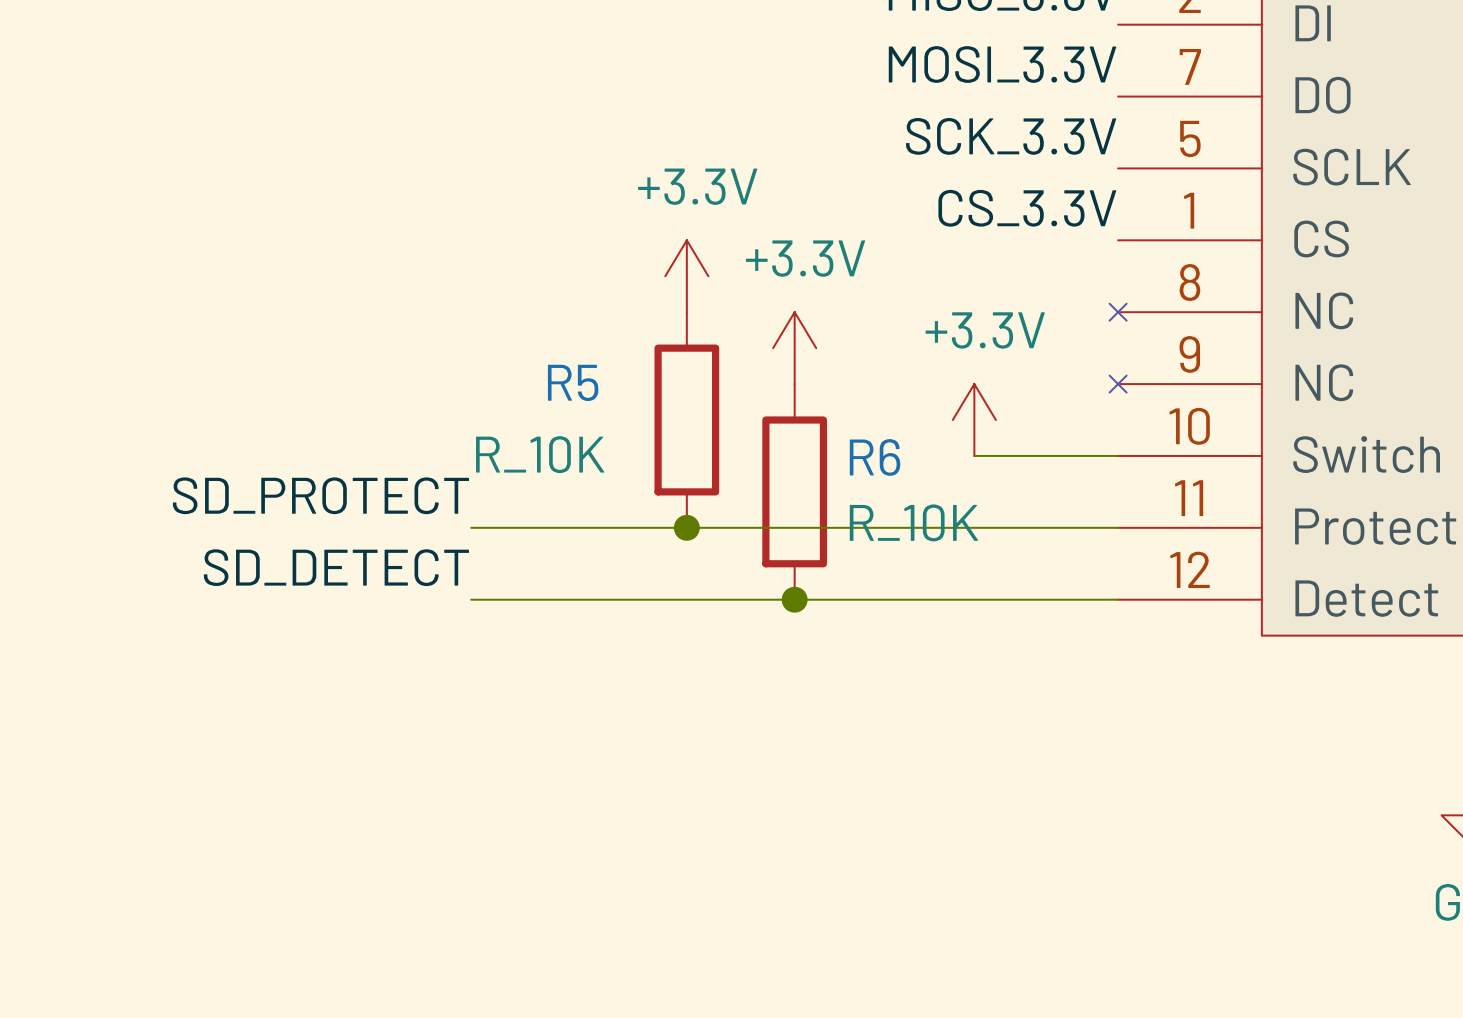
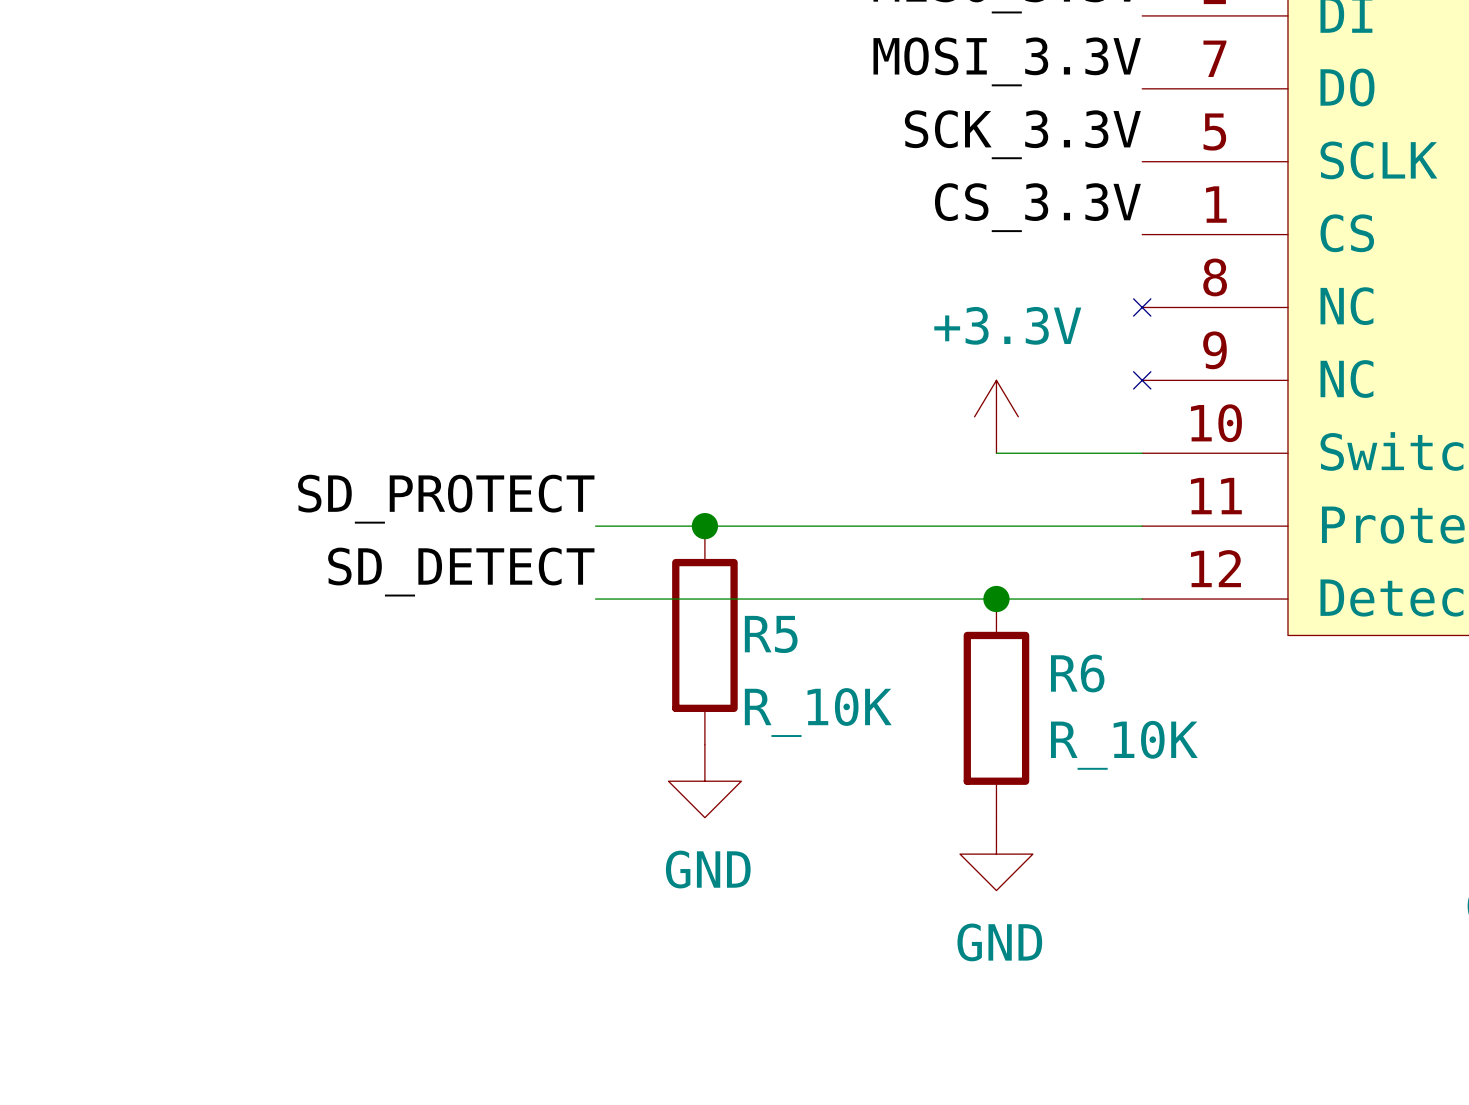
power symbol: +3.3V (686, 276) -> none
power symbol: +3.3V (794, 348) -> none
R5 name position: R5 (573, 382) -> R5 (771, 634)
R5 position: (686, 420) -> (704, 635)
R5 value position: R_10K (540, 454) -> R_10K (818, 712)
R6 position: (794, 491) -> (996, 708)
label position: SD_PROTECT (320, 495) -> SD_PROTECT (446, 499)
wire: (471, 527) (579, 527) -> none
label position: SD_DETECT (336, 567) -> SD_DETECT (461, 572)
wire: (471, 599) (579, 599) -> none
junction: (794, 599) -> none
junction: none -> (996, 599)
power symbol: none -> GND (704, 781)
power symbol: none -> GND (996, 854)

